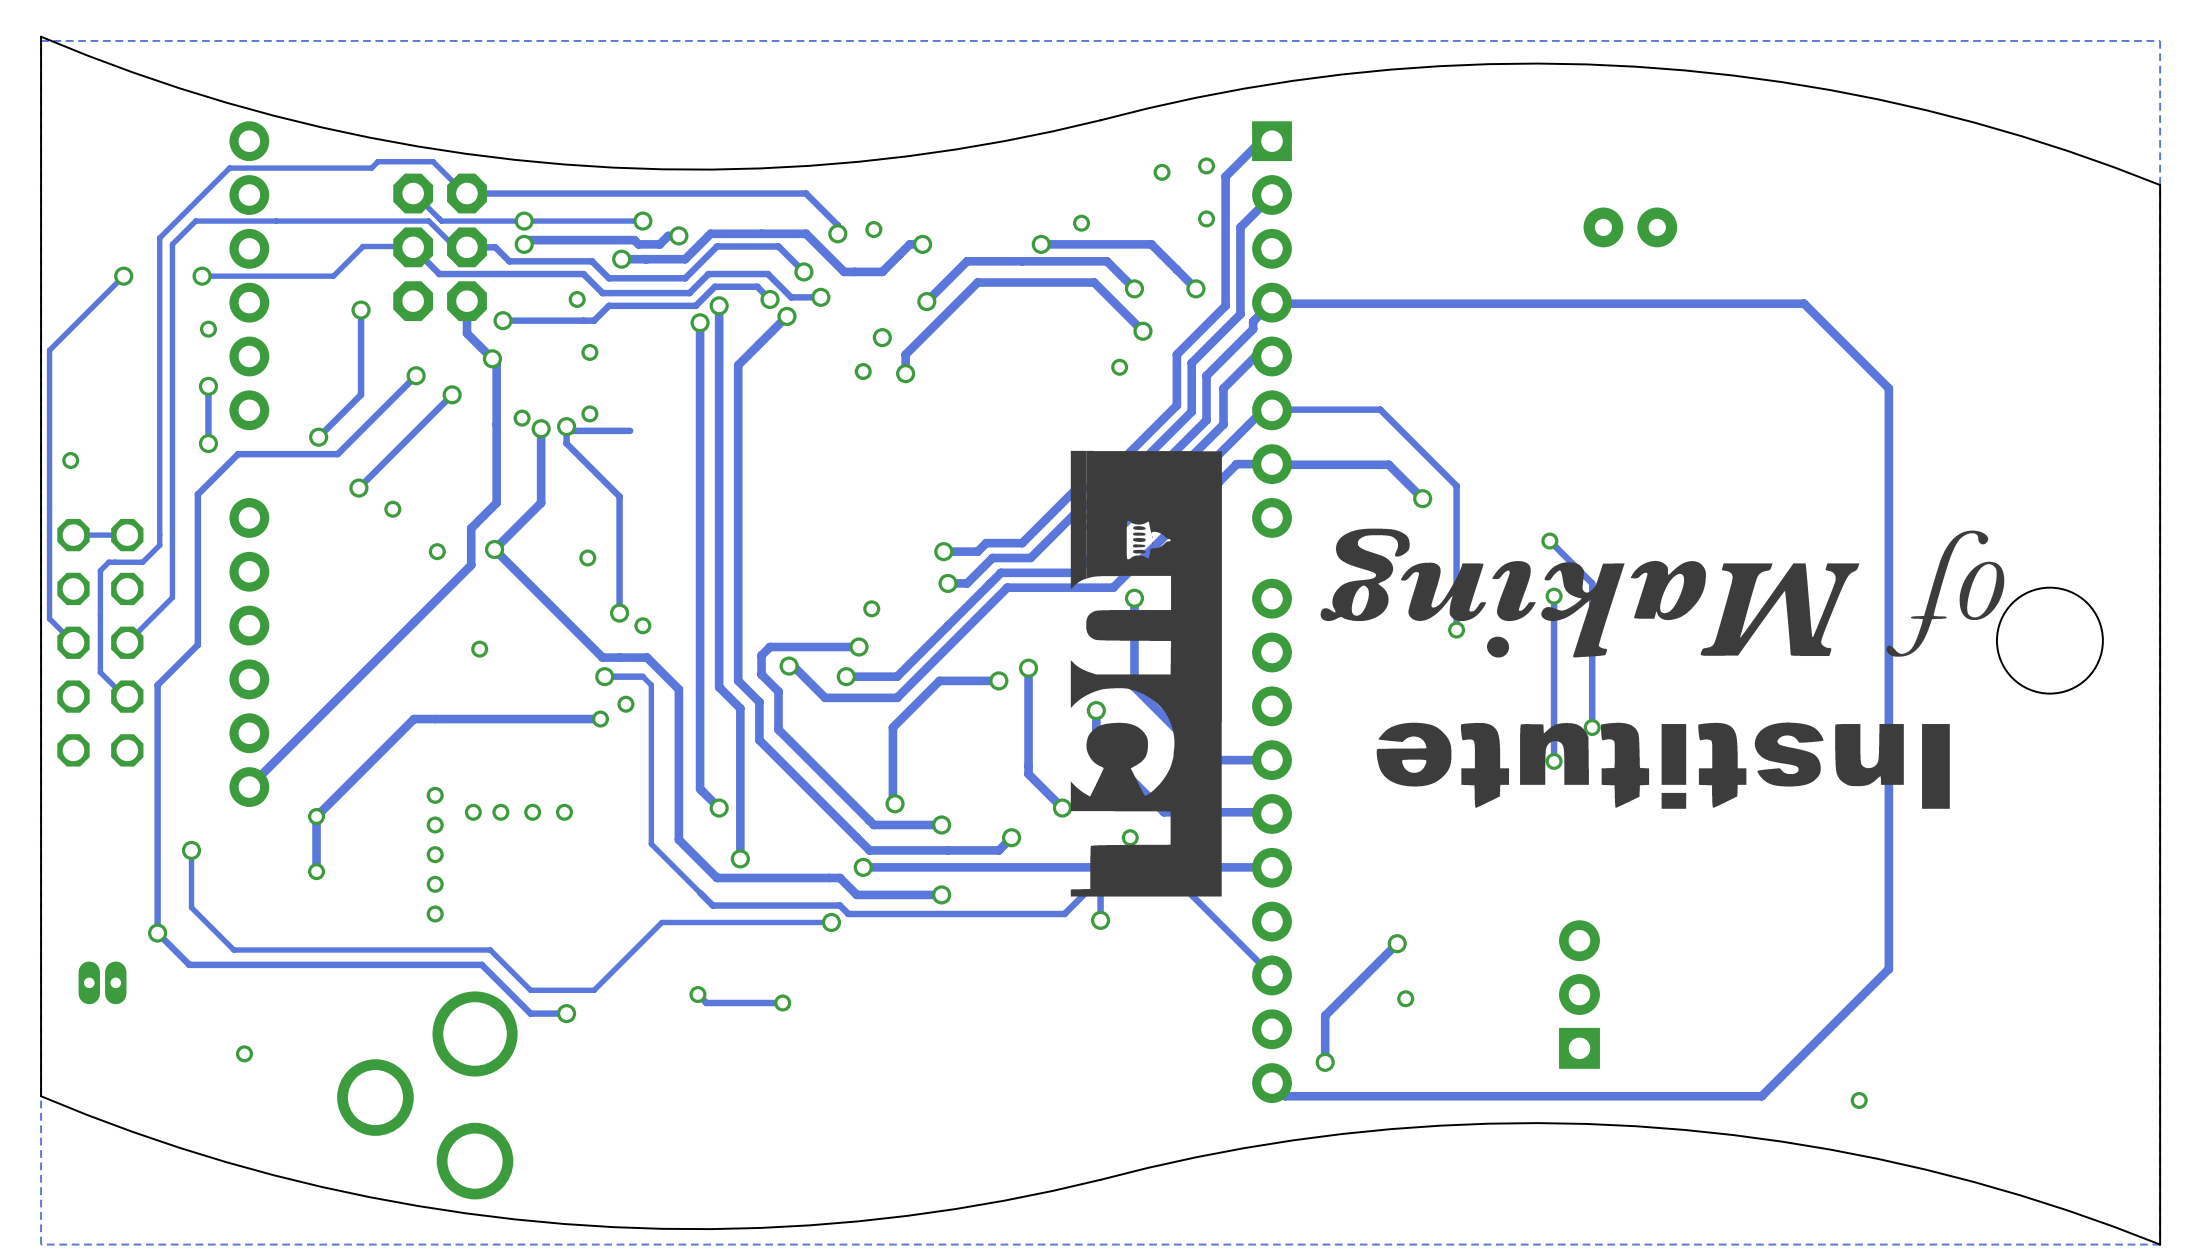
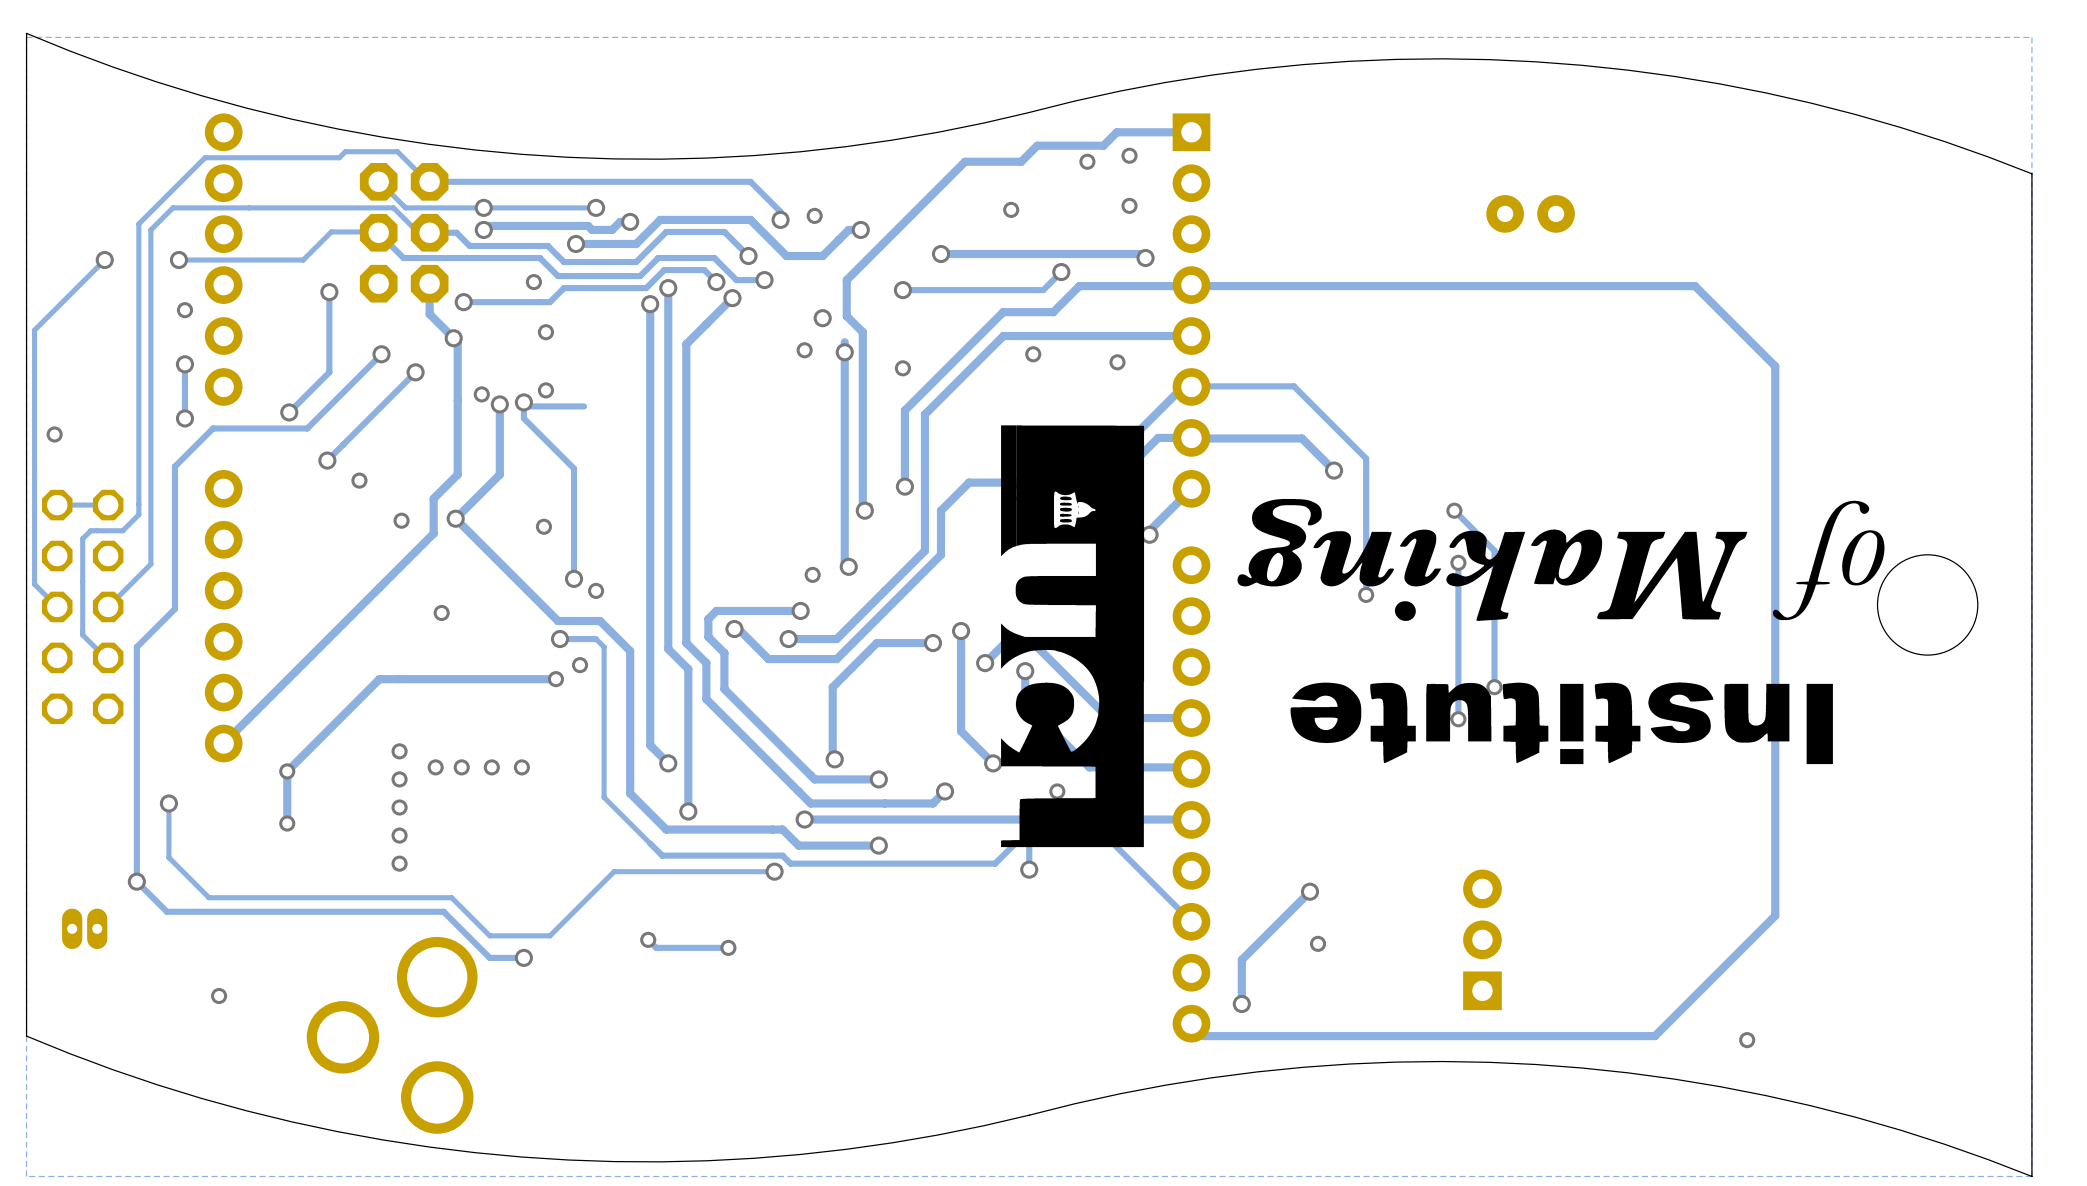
track: (1261, 141) (1225, 176) (1225, 305) (1176, 354) (1176, 405) (1094, 488) (1077, 488) (1022, 543) (986, 543) (977, 551) (943, 551) -> (1181, 132) (1116, 132) (1103, 145) (1037, 145) (1021, 161) (965, 161) (846, 280) (846, 316) (862, 332) (862, 508) (864, 510) (868, 506)
track: (1272, 197) (1272, 195) (1240, 227) (1240, 314) (1191, 363) (1191, 411) (1098, 505) (1083, 505) (1030, 558) (992, 558) (967, 583) (948, 583) -> none
track: (1041, 244) (1151, 244) (1195, 288) -> none
via position: (1041, 244) -> (941, 254)
track: none -> (941, 254) (1141, 254) (1145, 258)
track: (1134, 288) (1106, 261) (967, 261) (926, 301) -> (1061, 272) (1043, 290) (902, 290)
via position: (1195, 288) -> (1145, 258)
via position: (926, 301) -> (902, 290)
track: (1270, 303) (1253, 321) (1253, 329) (1206, 375) (1206, 420) (1104, 521) (1092, 521) -> (1190, 286) (1079, 286) (1053, 312) (1003, 312) (904, 410) (904, 486)
track: (1142, 331) (1094, 282) (977, 282) (905, 354) (905, 363) -> none
via: (1142, 331) -> none
track: (1255, 356) (1223, 388) (1223, 424) (1075, 572) (1000, 572) (990, 583) -> (1175, 336) (1003, 336) (924, 414) (924, 550)
via position: (1119, 367) -> (1033, 354)
track: none -> (844, 352) (844, 562) (848, 566)
via: none -> (1117, 362)
via: none -> (902, 368)
track: (1189, 511) (1113, 587) (1007, 587) -> (1113, 482) (969, 482) (941, 510) (941, 554)
via: none -> (904, 486)
track: none -> (1191, 488) (1149, 530) (1149, 534)
via position: (943, 551) -> (864, 510)
via: none -> (1149, 534)
via: (948, 583) -> none
track: (1134, 598) (1134, 687) (1207, 760) -> (985, 663) (1005, 643) (1033, 643) (1108, 718) (1130, 718)
via: (1134, 598) -> none
via: none -> (848, 566)
via: none -> (985, 663)

